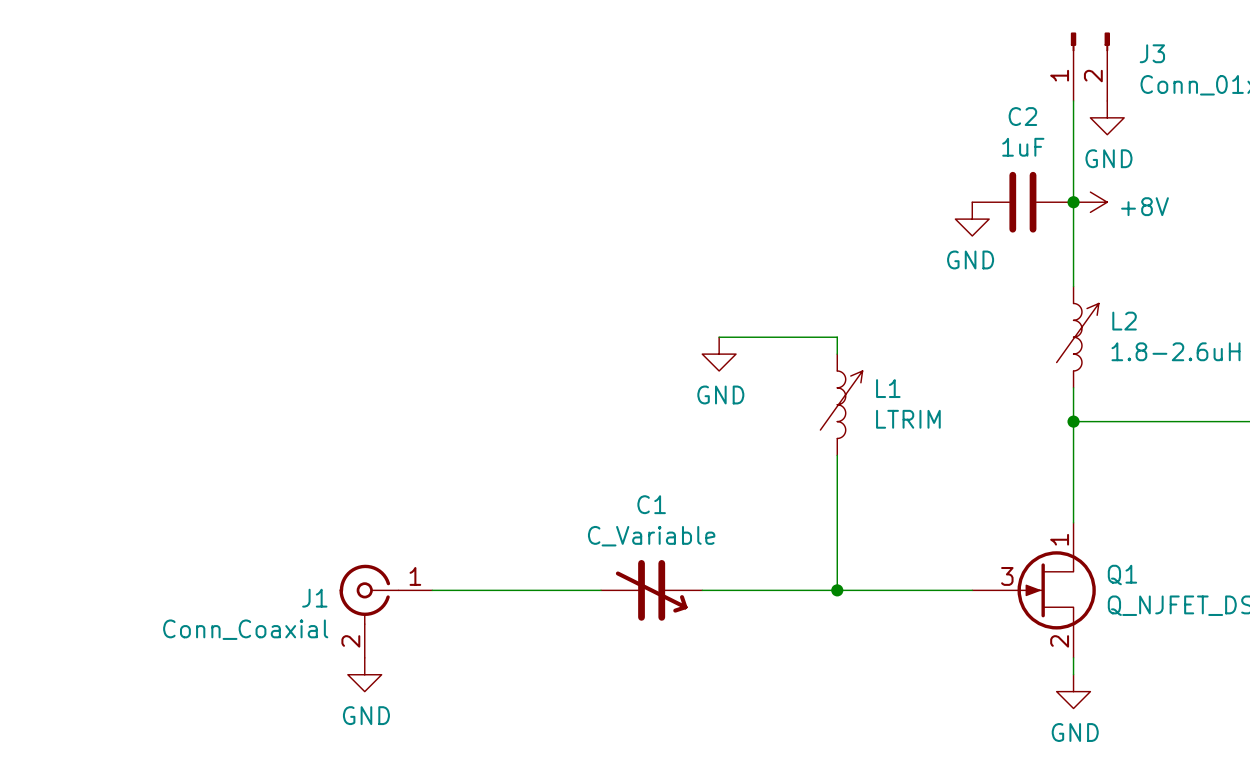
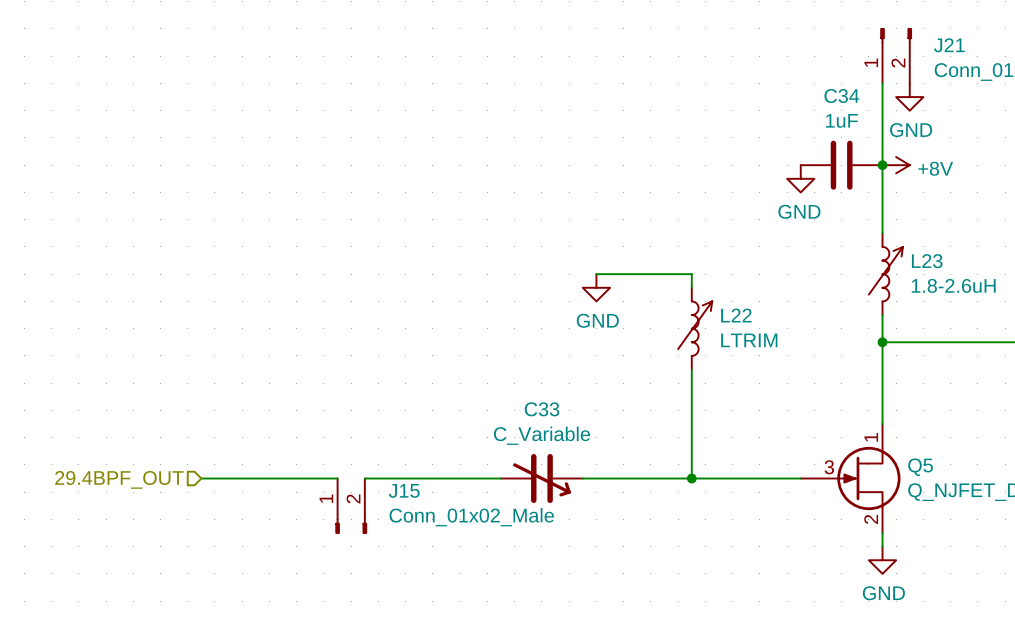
J3 name: J3 (1152, 53) -> J21 (949, 45)
C2 name: C2 (1022, 116) -> C34 (841, 96)
L2 name: L2 (1124, 321) -> L23 (927, 261)
L1 name: L1 (888, 388) -> L22 (736, 315)
C1 name: C1 (651, 504) -> C33 (542, 409)
Q1 name: Q1 (1122, 575) -> Q5 (920, 467)
hierarchical label: none -> 29.4BPF_OUT (119, 479)
wire: none -> (201, 478) (337, 478)
J1: Conn_Coaxial (385, 611) -> none
J15: none -> Conn_01x02_Male (351, 506)
power symbol: GND (364, 674) -> none

